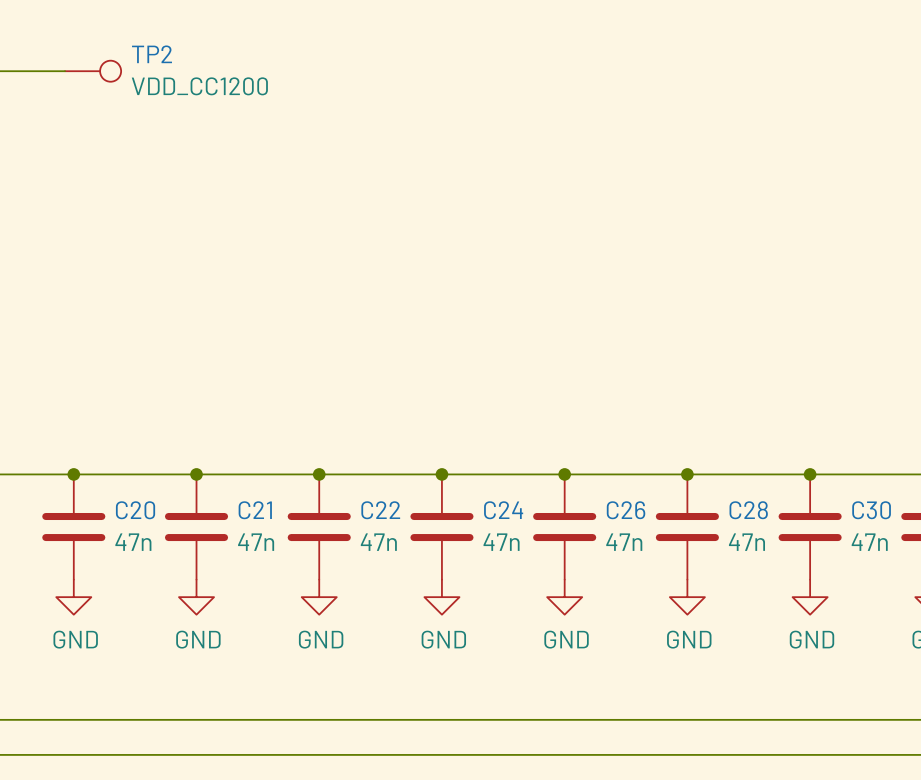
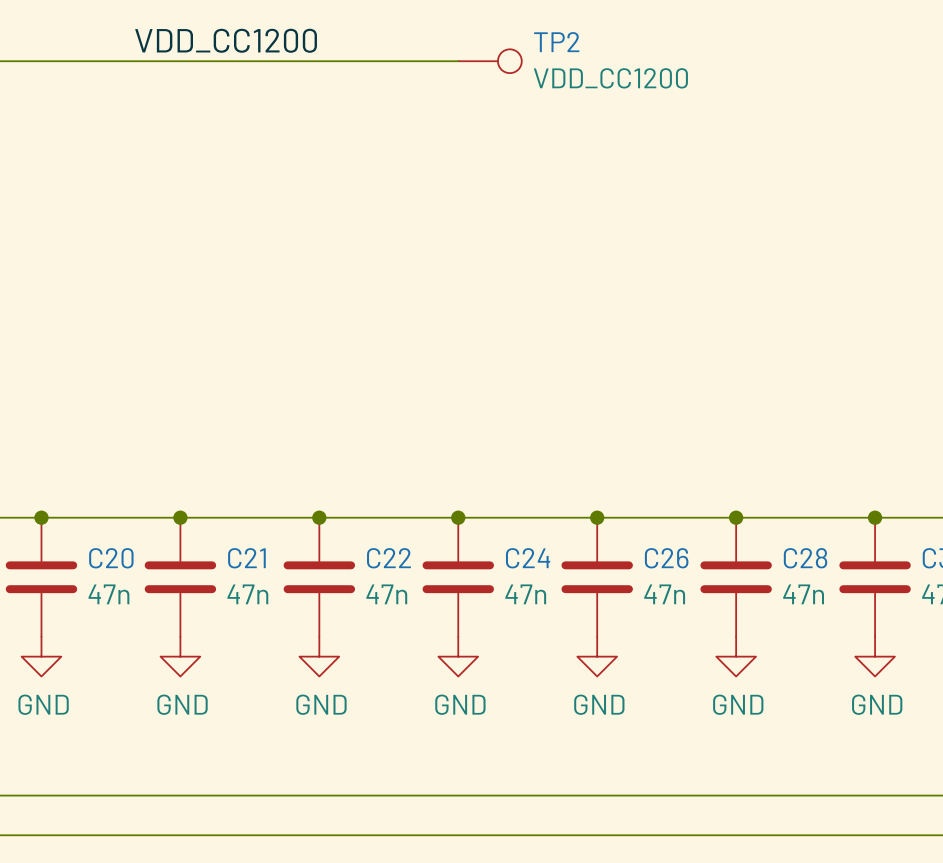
label: none -> VDD_CC1200 (226, 40)
wire: none -> (31, 61) (458, 61)
TP2 position: (93, 71) -> (490, 61)

